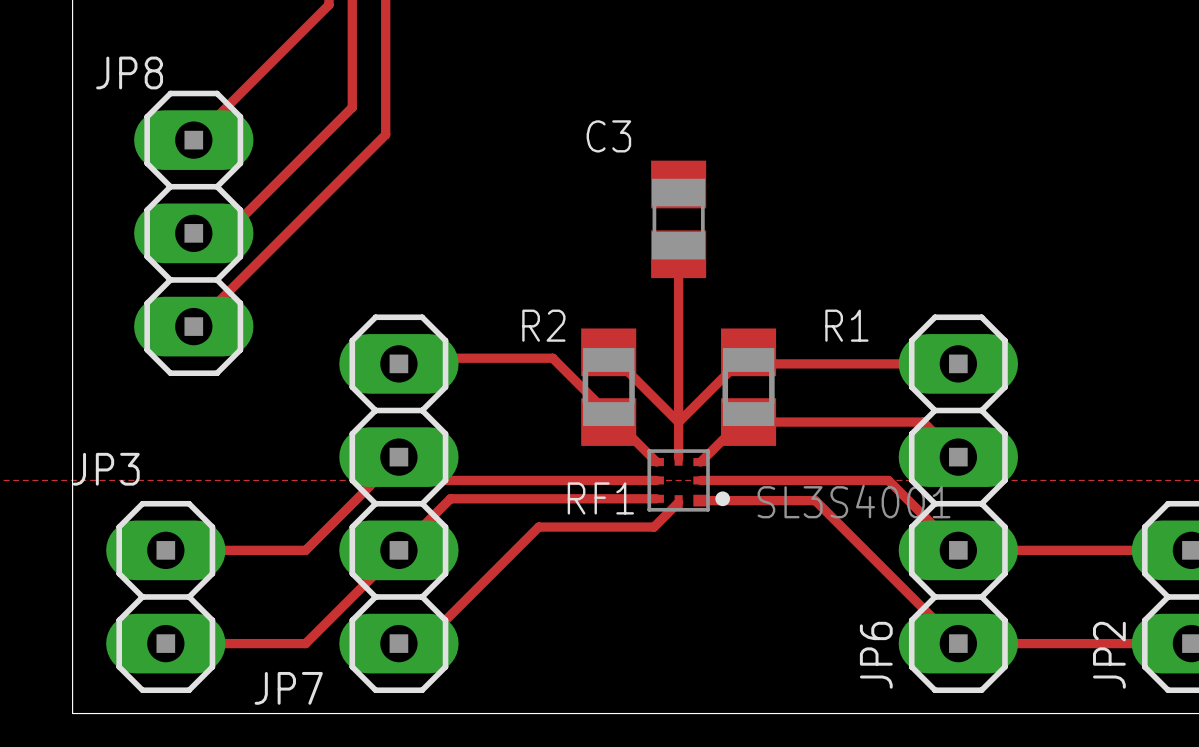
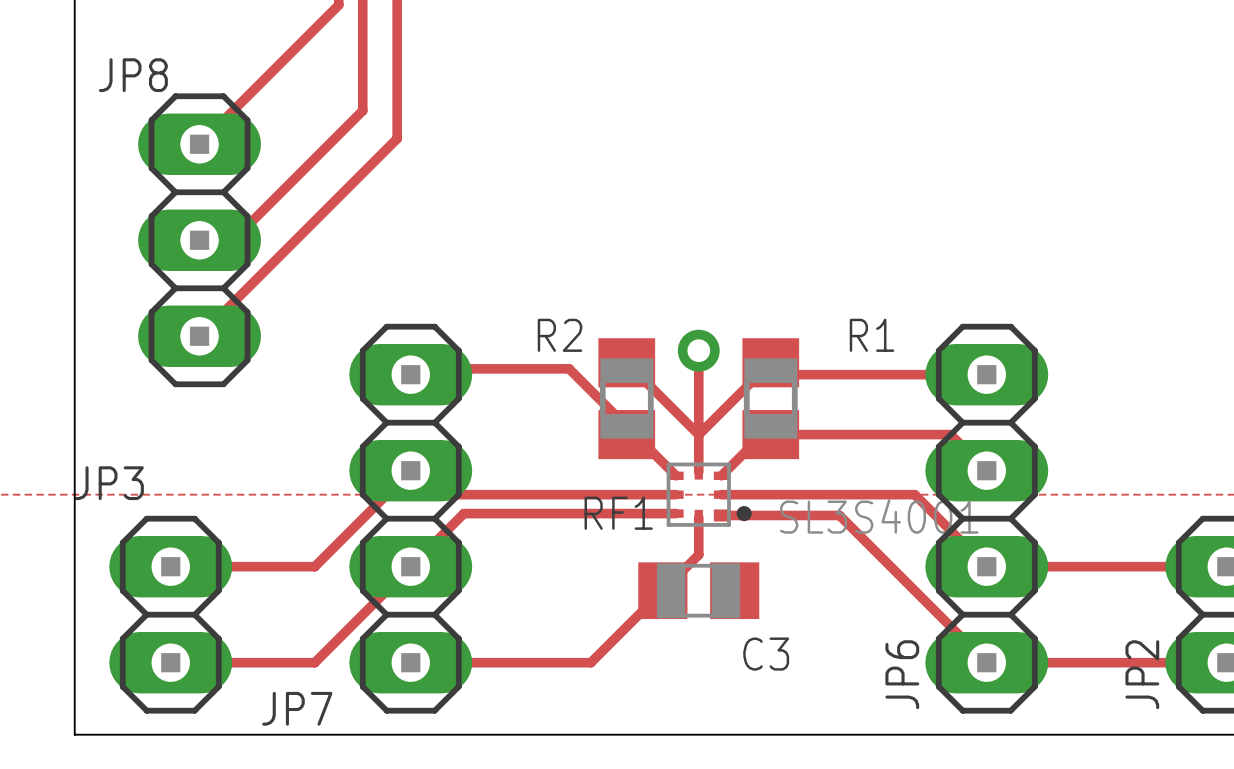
C3 name position: C3 (608, 136) -> C3 (766, 654)
C3 rotation: 0° (678, 219) -> 90° clockwise (698, 590)
C3 position: (678, 219) -> (698, 590)
track: (678, 254) (678, 340) -> none
via: none -> (698, 350)
track: (678, 502) (654, 527) (538, 527) (422, 643) -> (698, 517) (698, 554) (590, 662) (434, 662)

